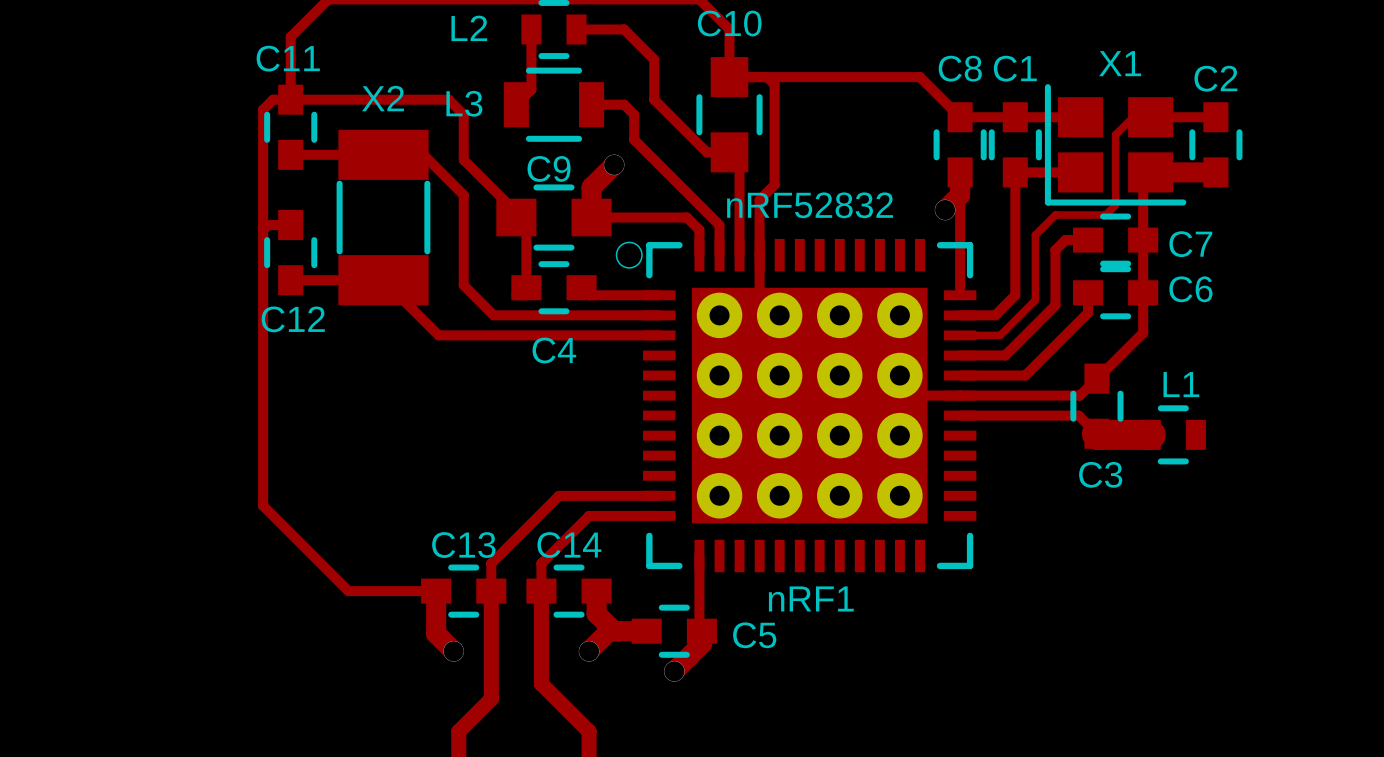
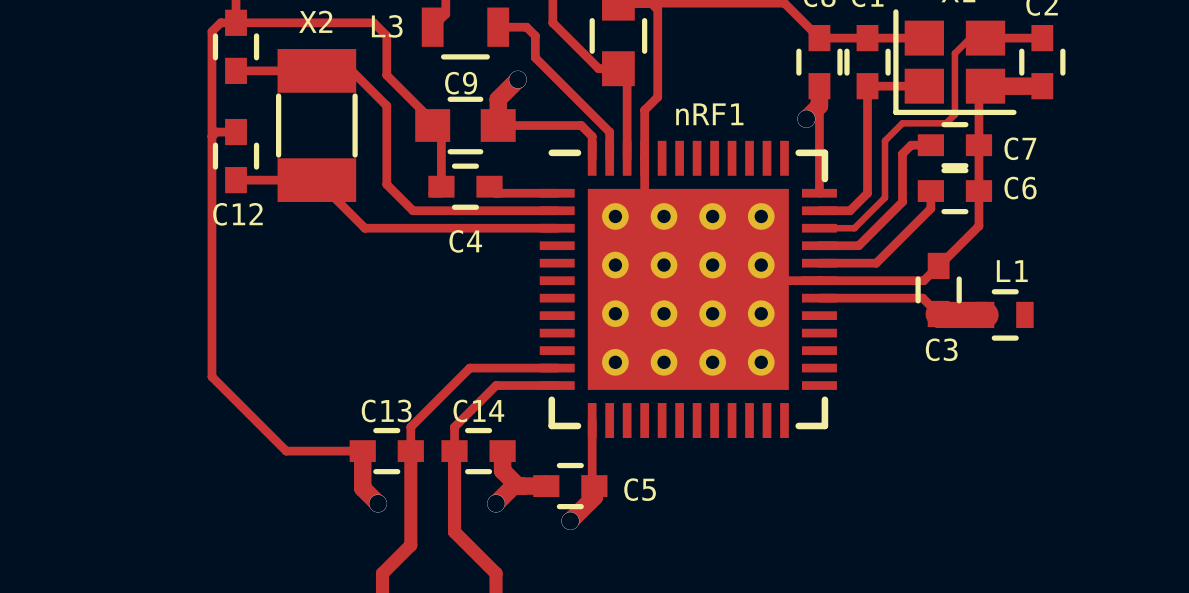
nRF1 value: nRF52832 (810, 205) -> none
nRF1 footprint: [616, 238, 977, 573] -> [539, 140, 837, 438]
nRF1 name position: nRF1 (811, 598) -> nRF1 (709, 114)

